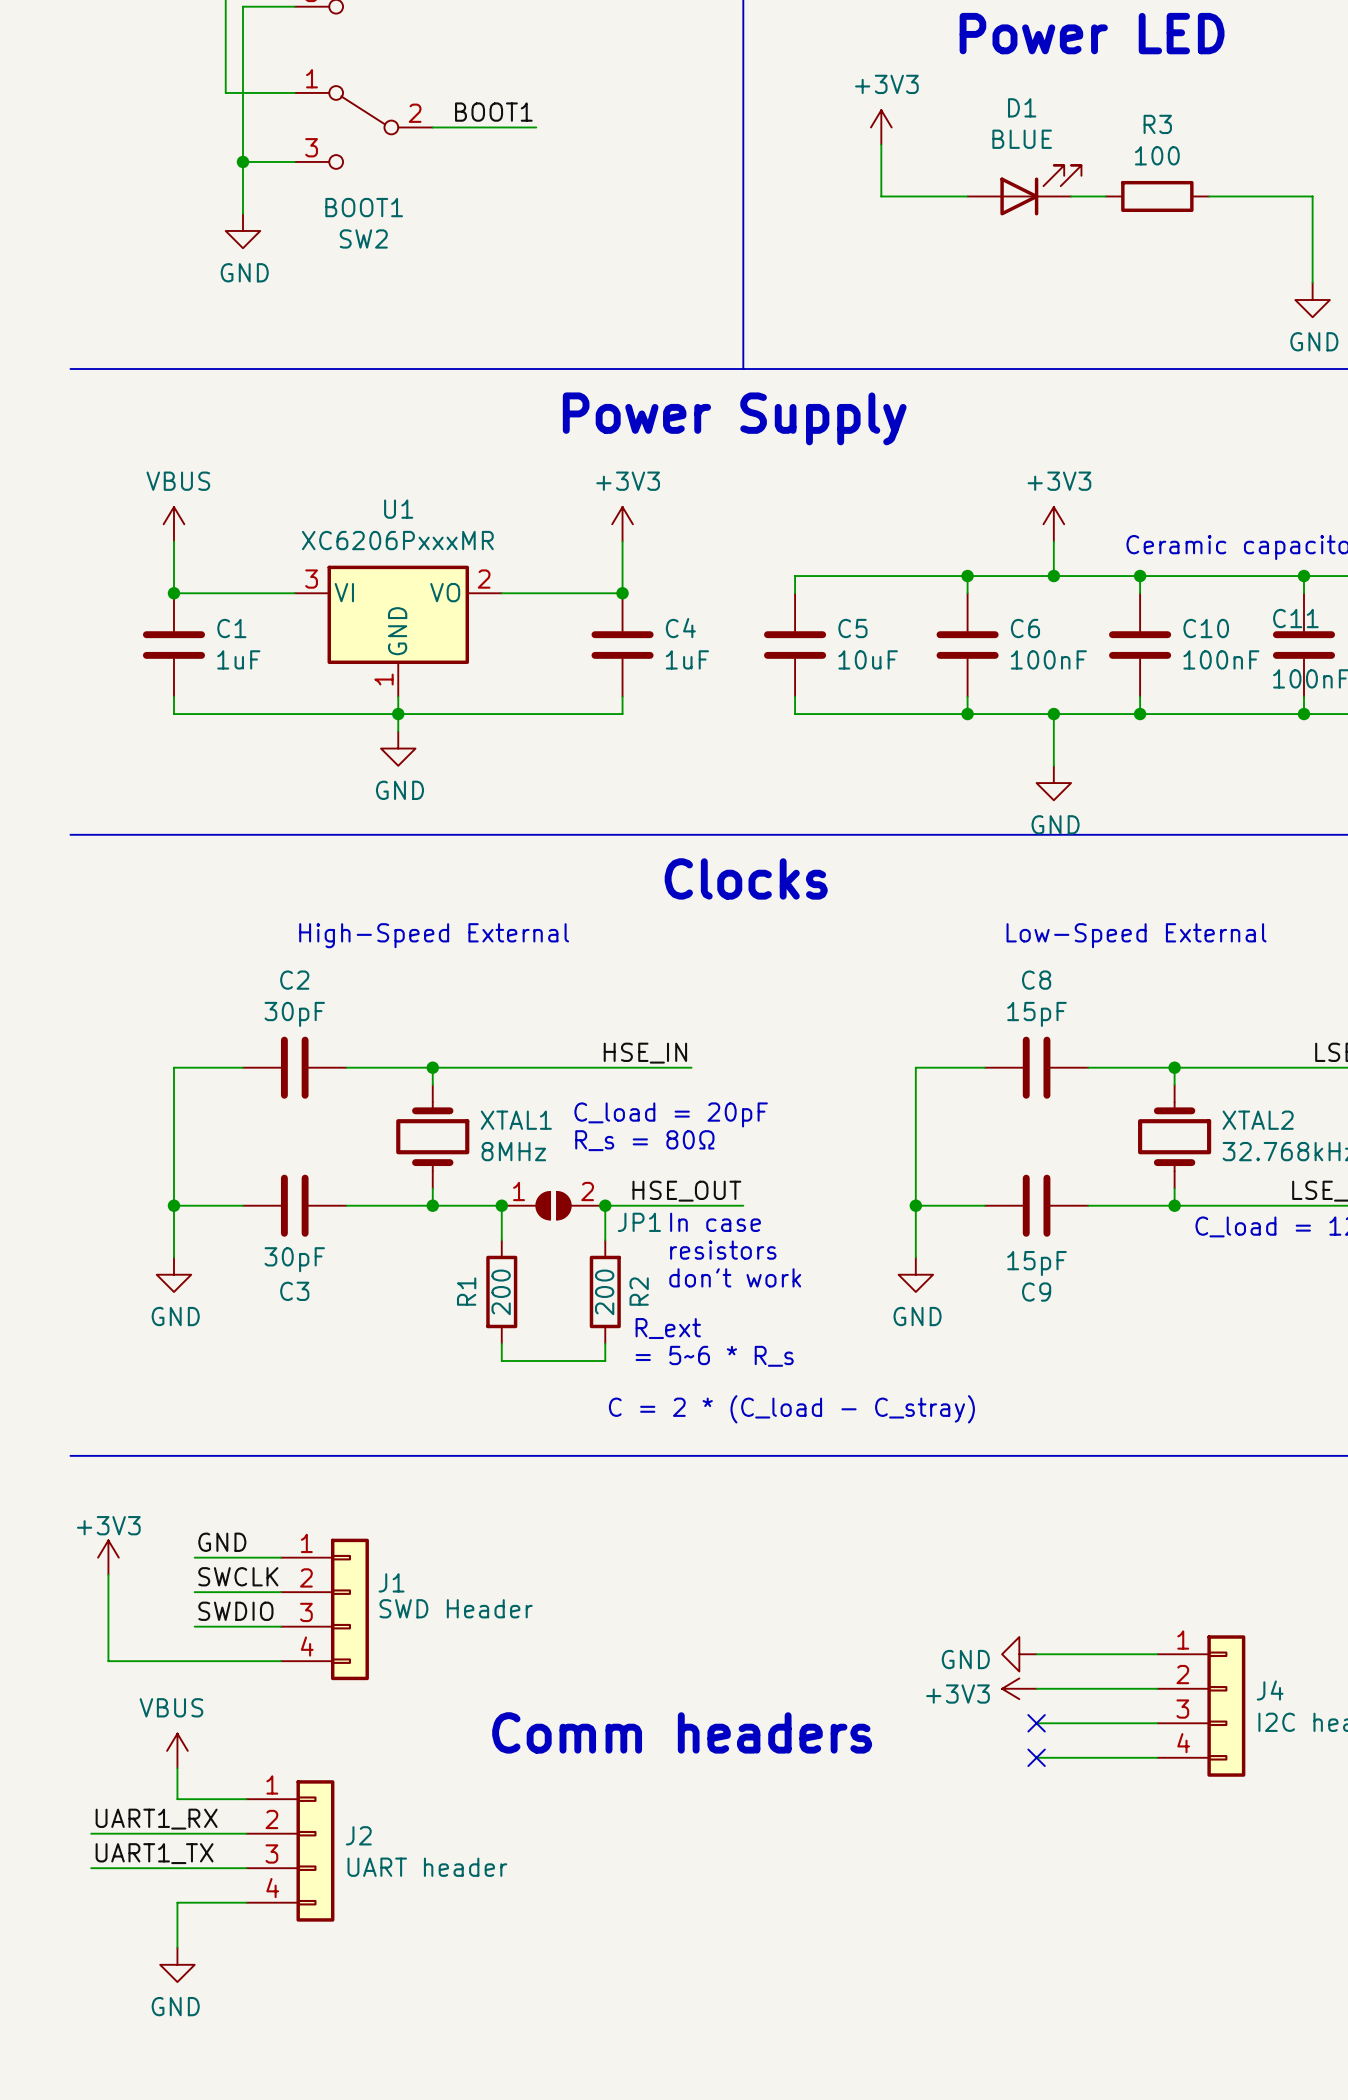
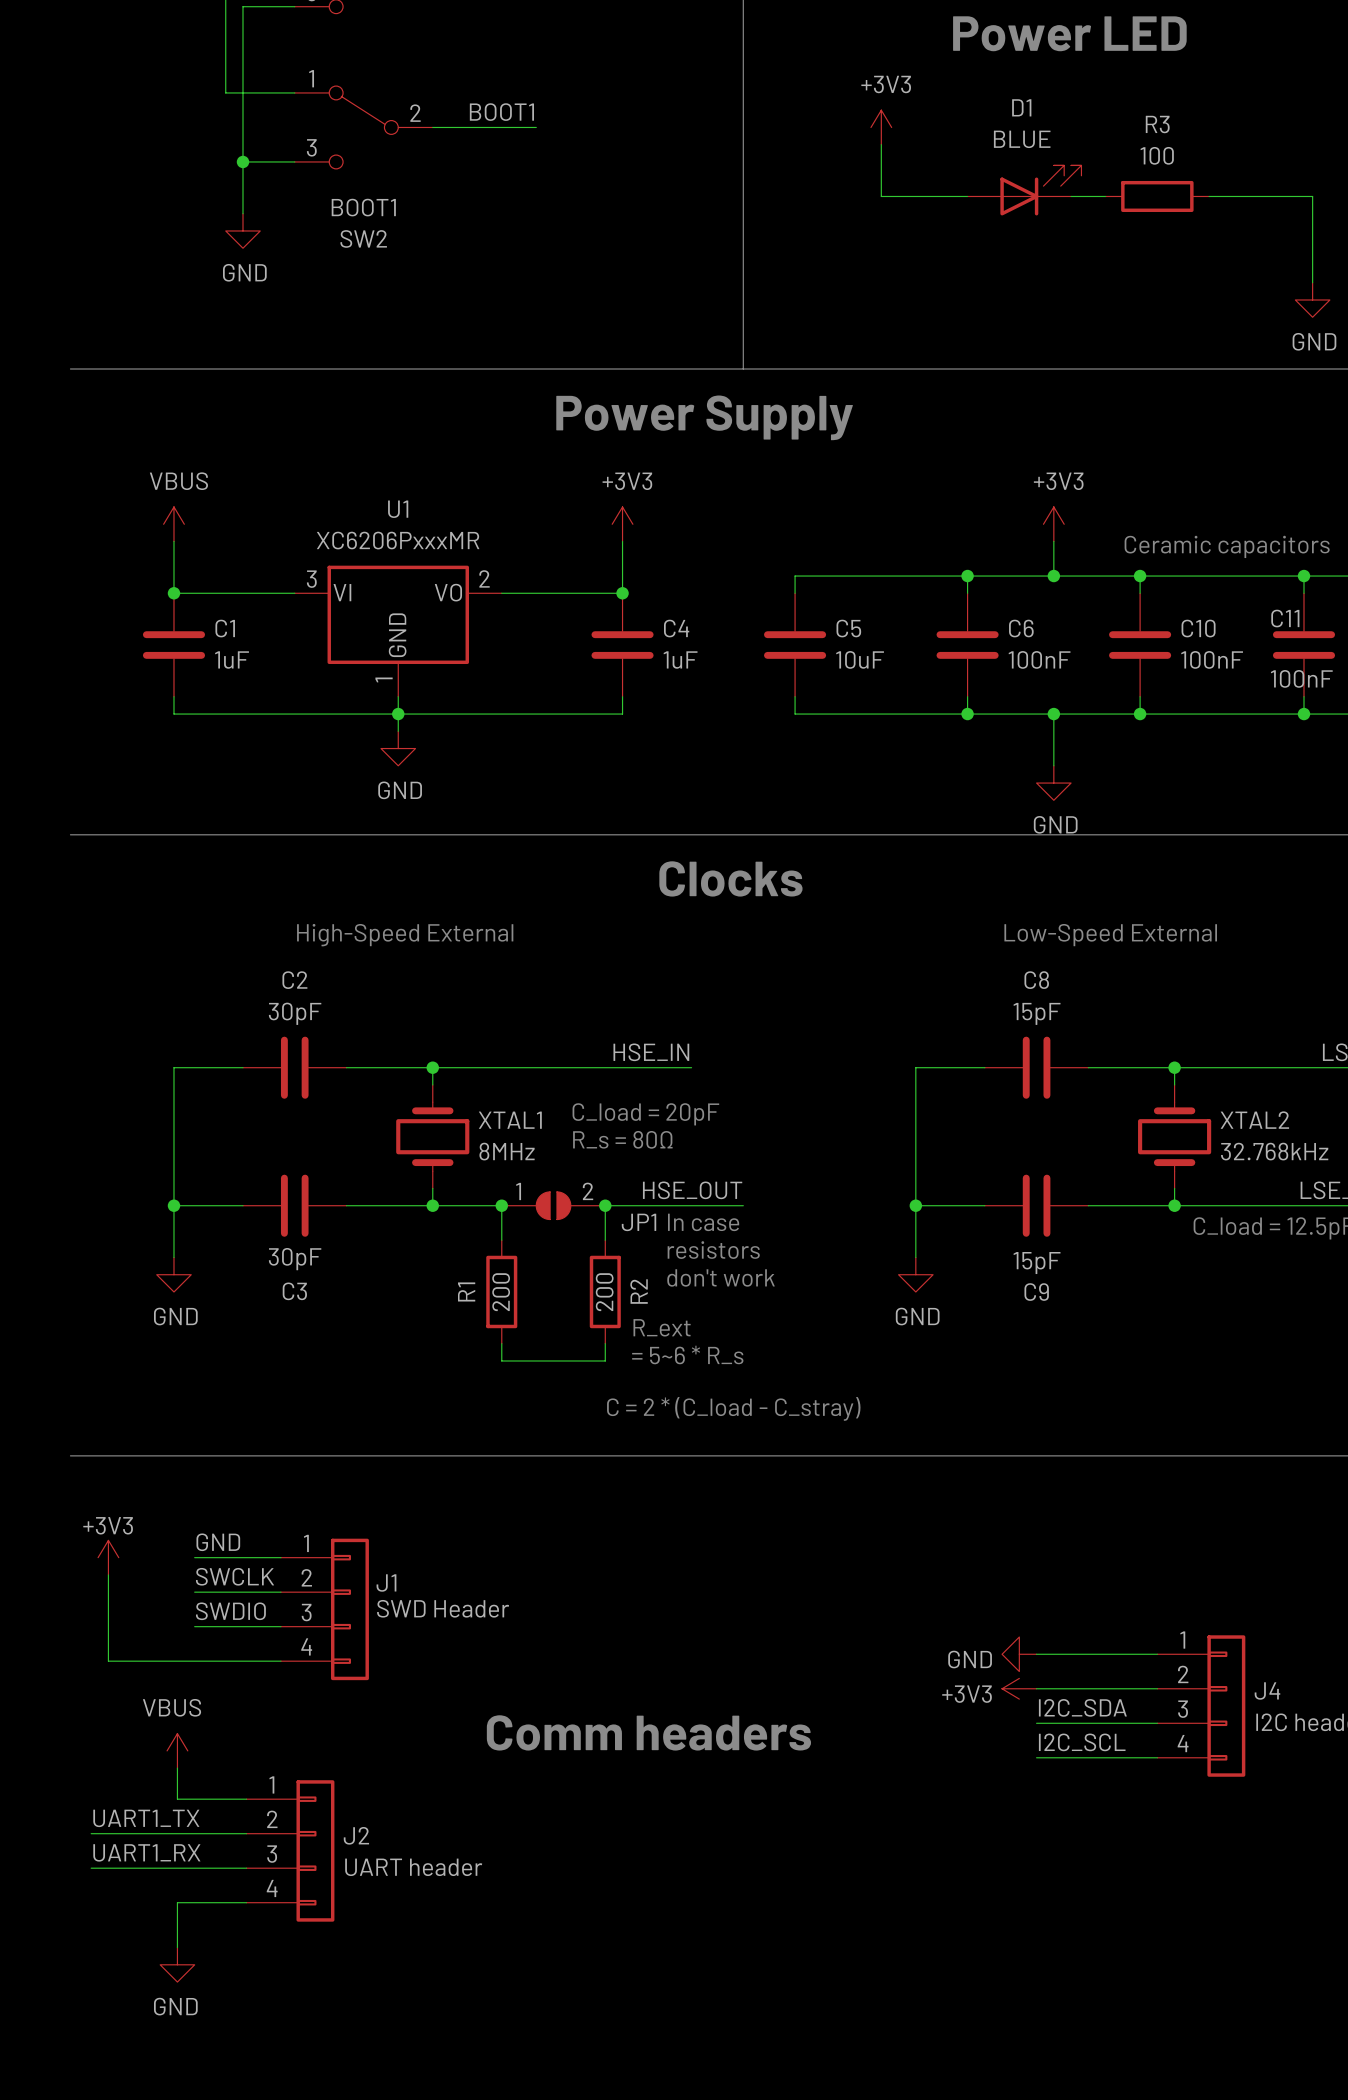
label: none -> I2C_SDA (1082, 1707)
no-connect mark: (1036, 1723) -> none
label: none -> I2C_SCL (1082, 1742)
no-connect mark: (1036, 1757) -> none
label: UART1_RX (156, 1819) -> UART1_TX (146, 1818)
label: UART1_TX (154, 1853) -> UART1_RX (146, 1852)

